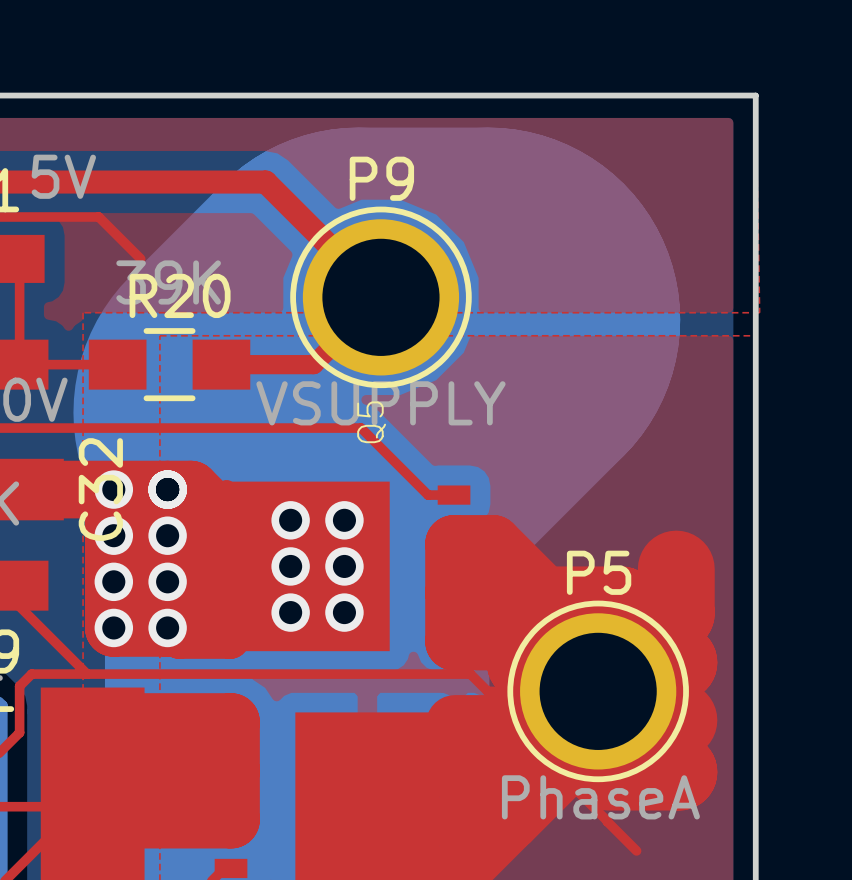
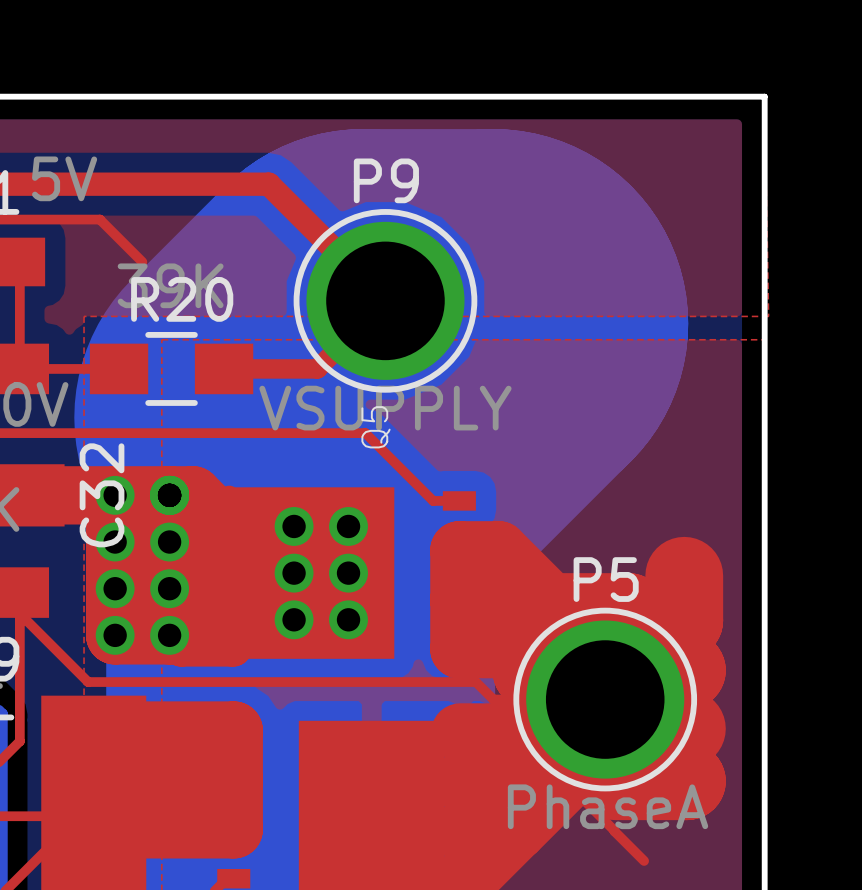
top track: (87, 674) (31, 674) (19, 686) -> (19, 613) (19, 694)

